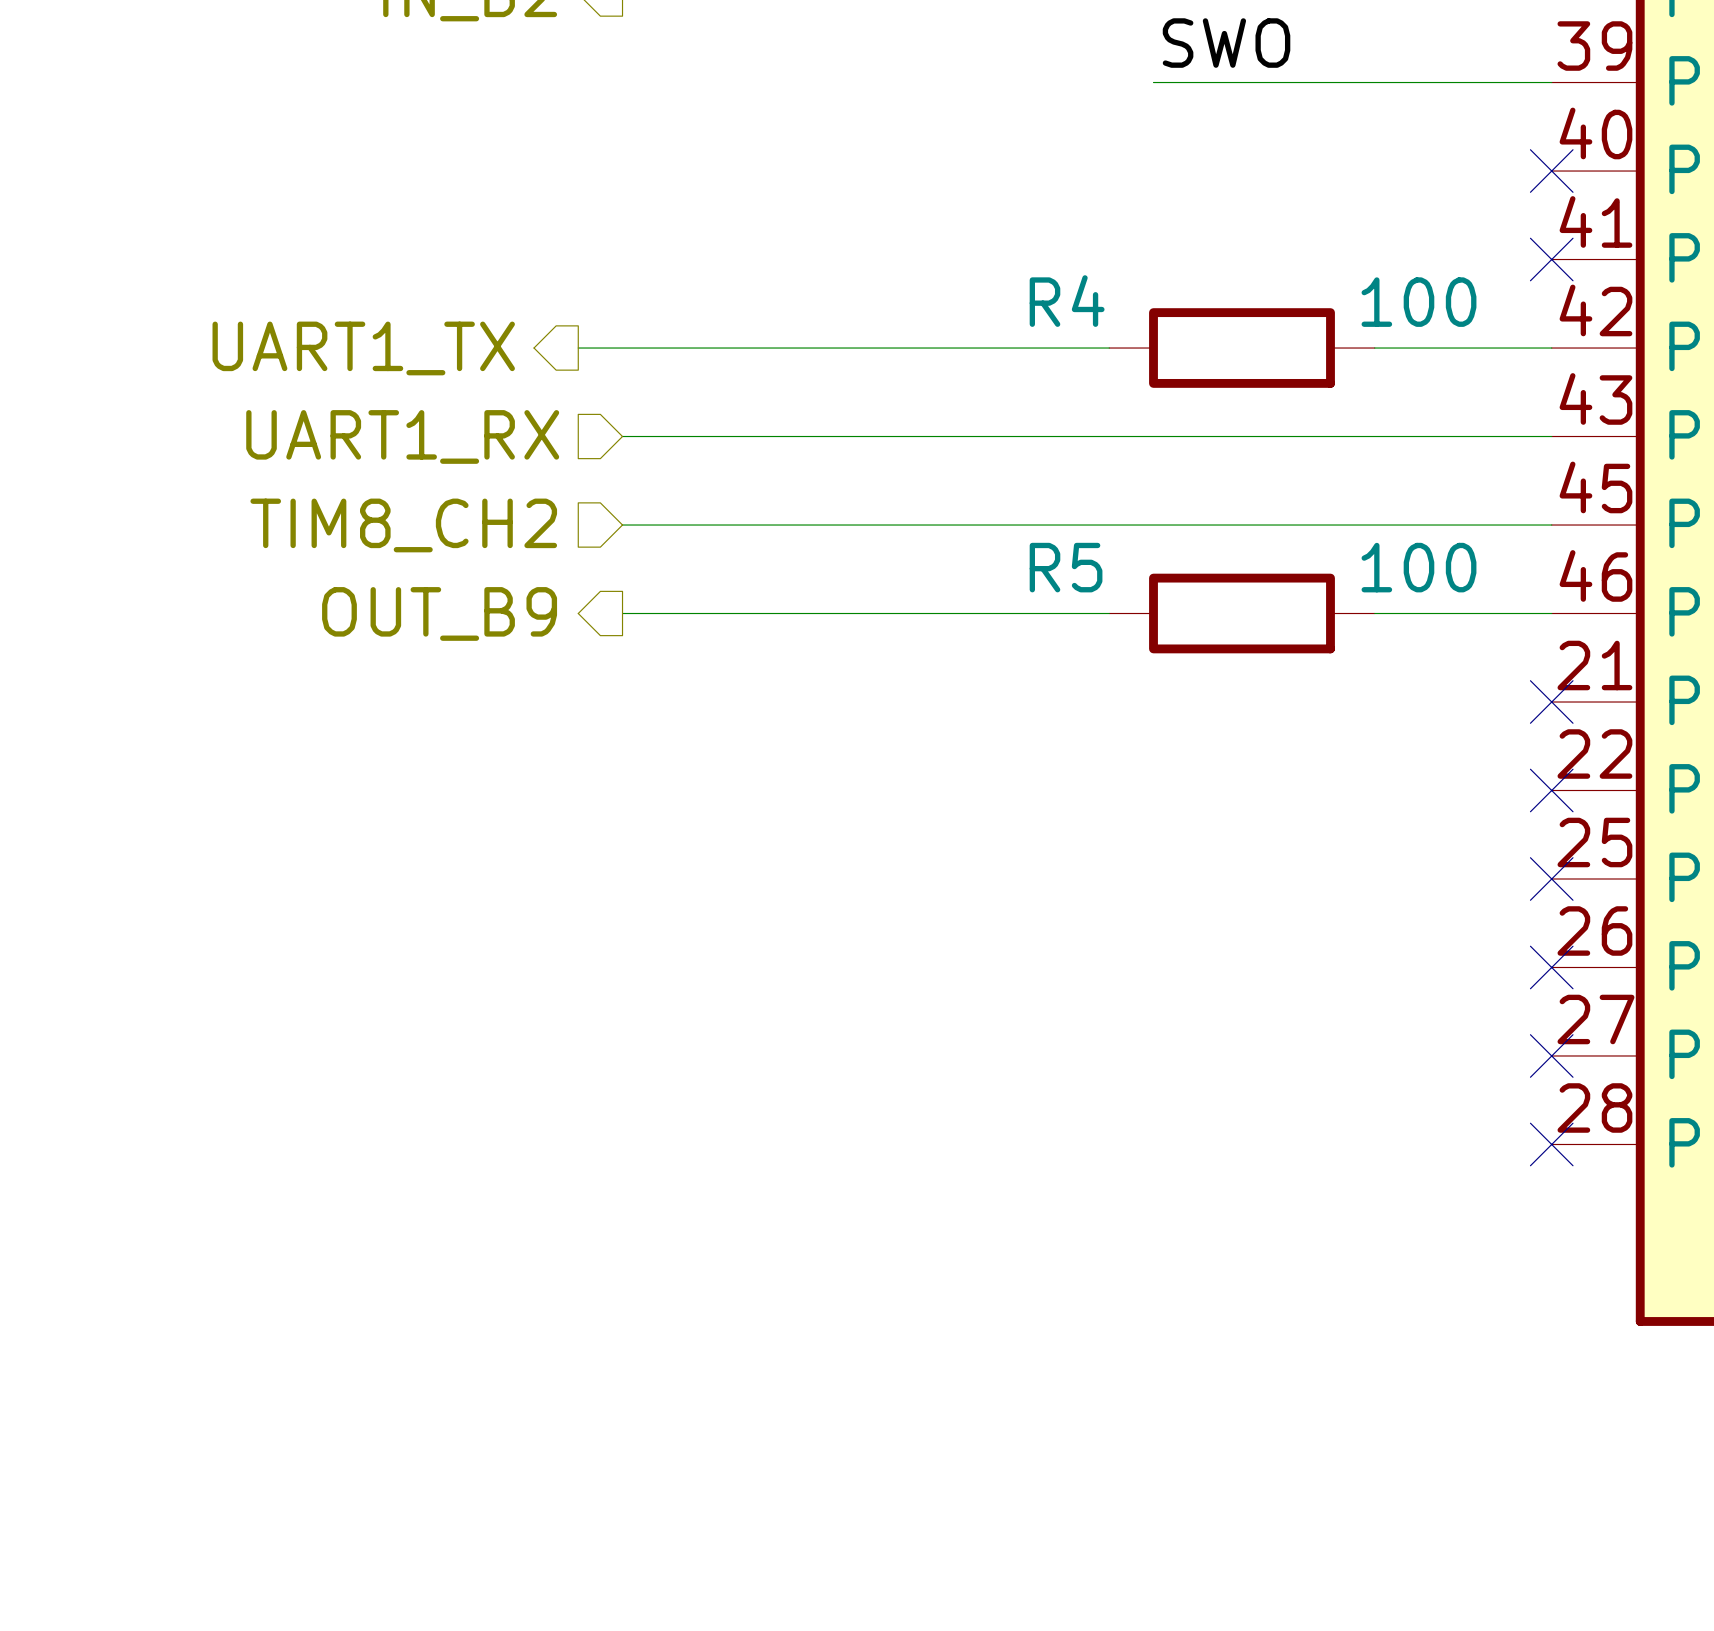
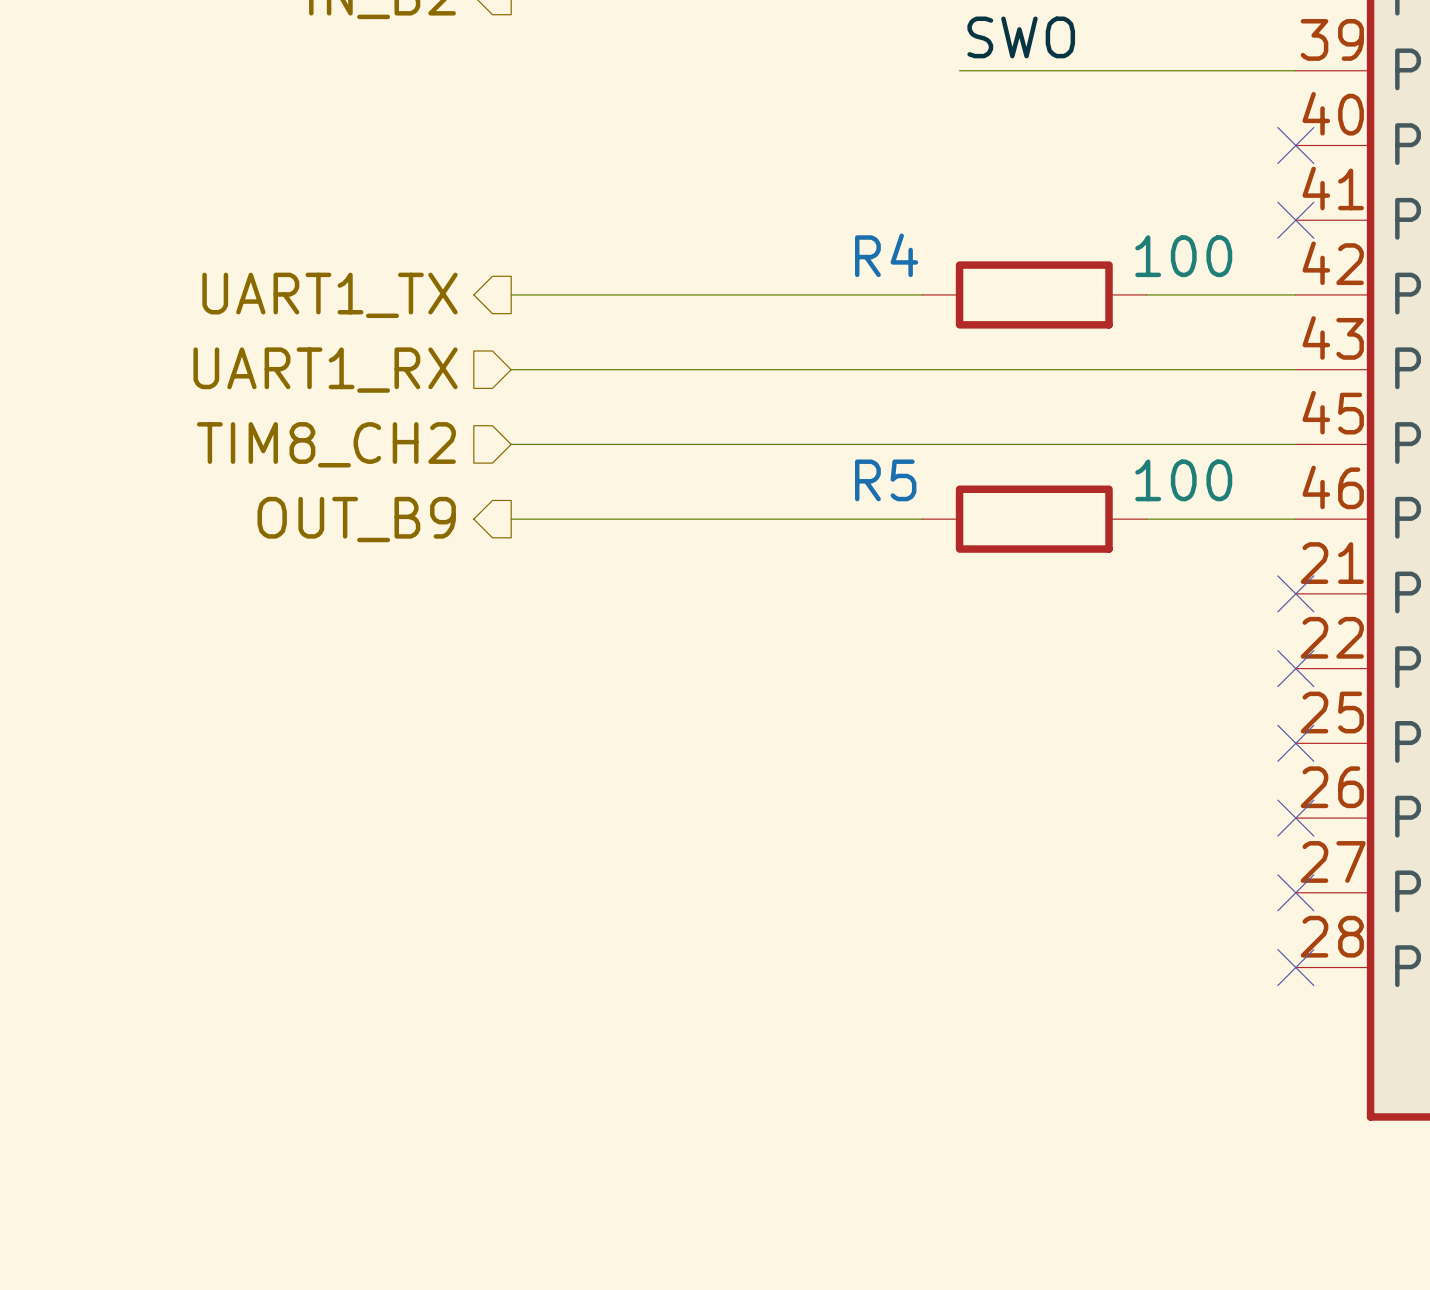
hierarchical label position: UART1_TX (363, 348) -> UART1_TX (330, 295)
wire: (578, 348) (622, 348) -> none

